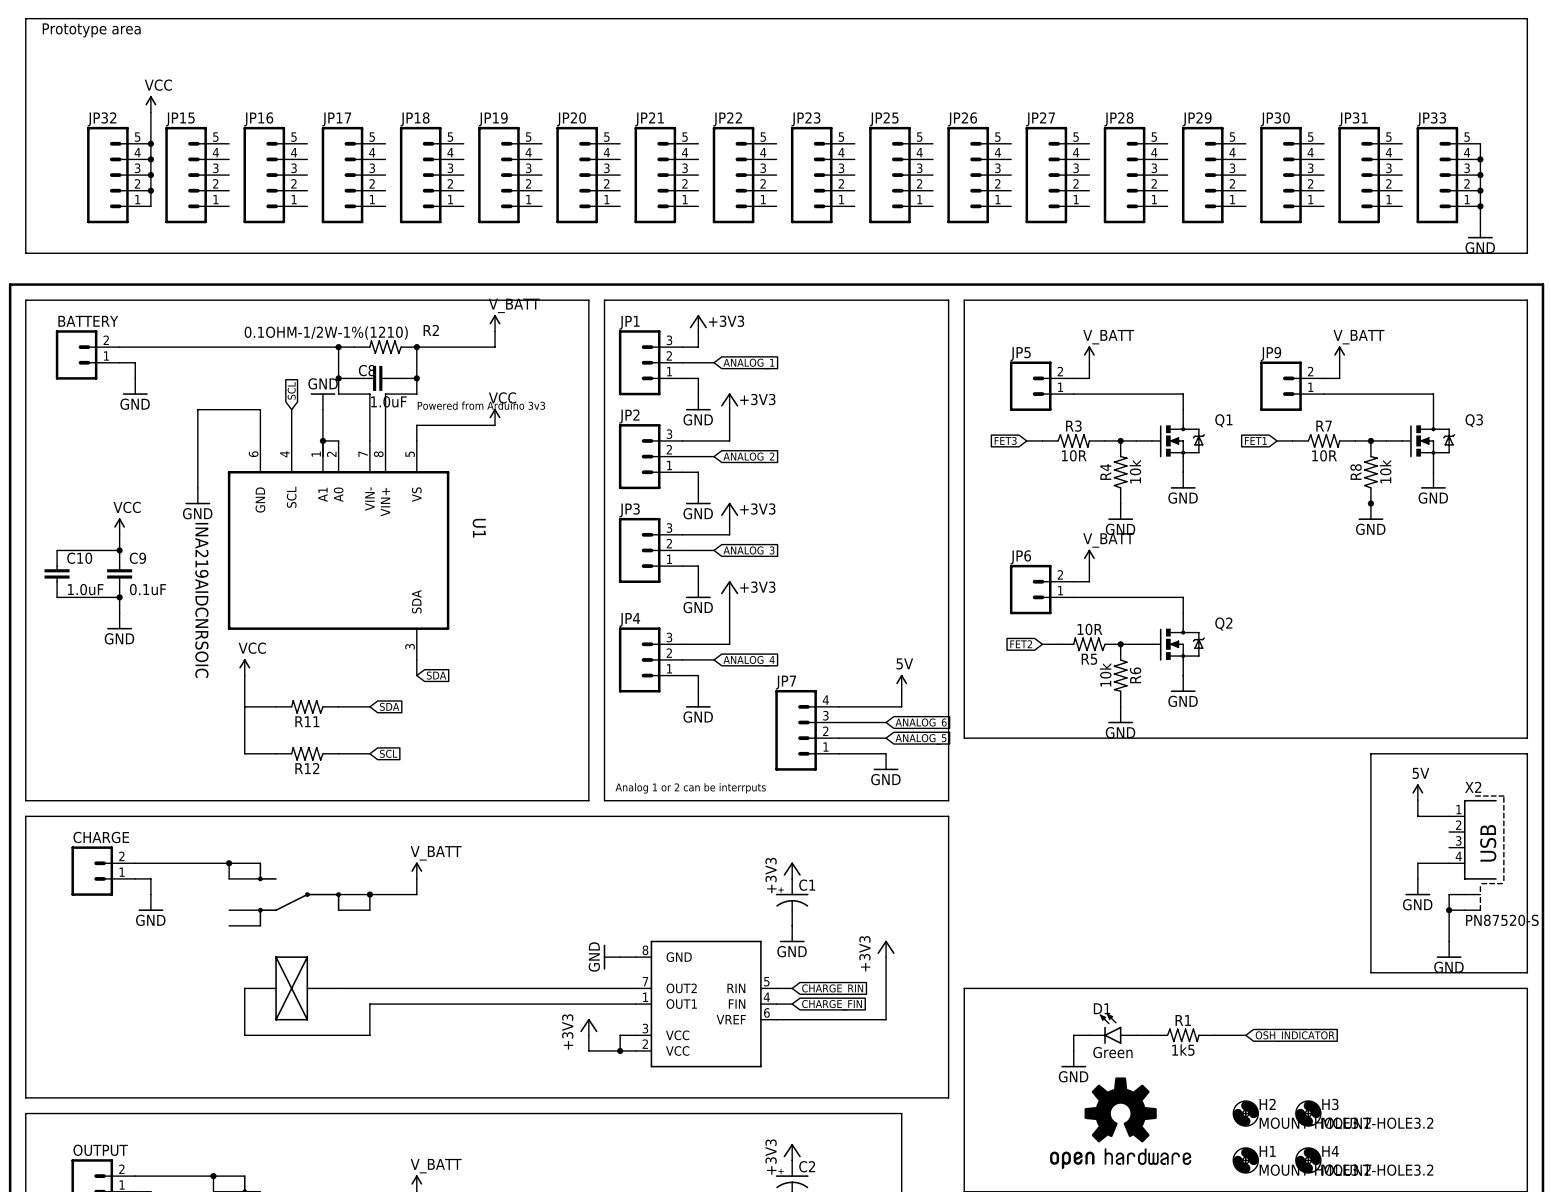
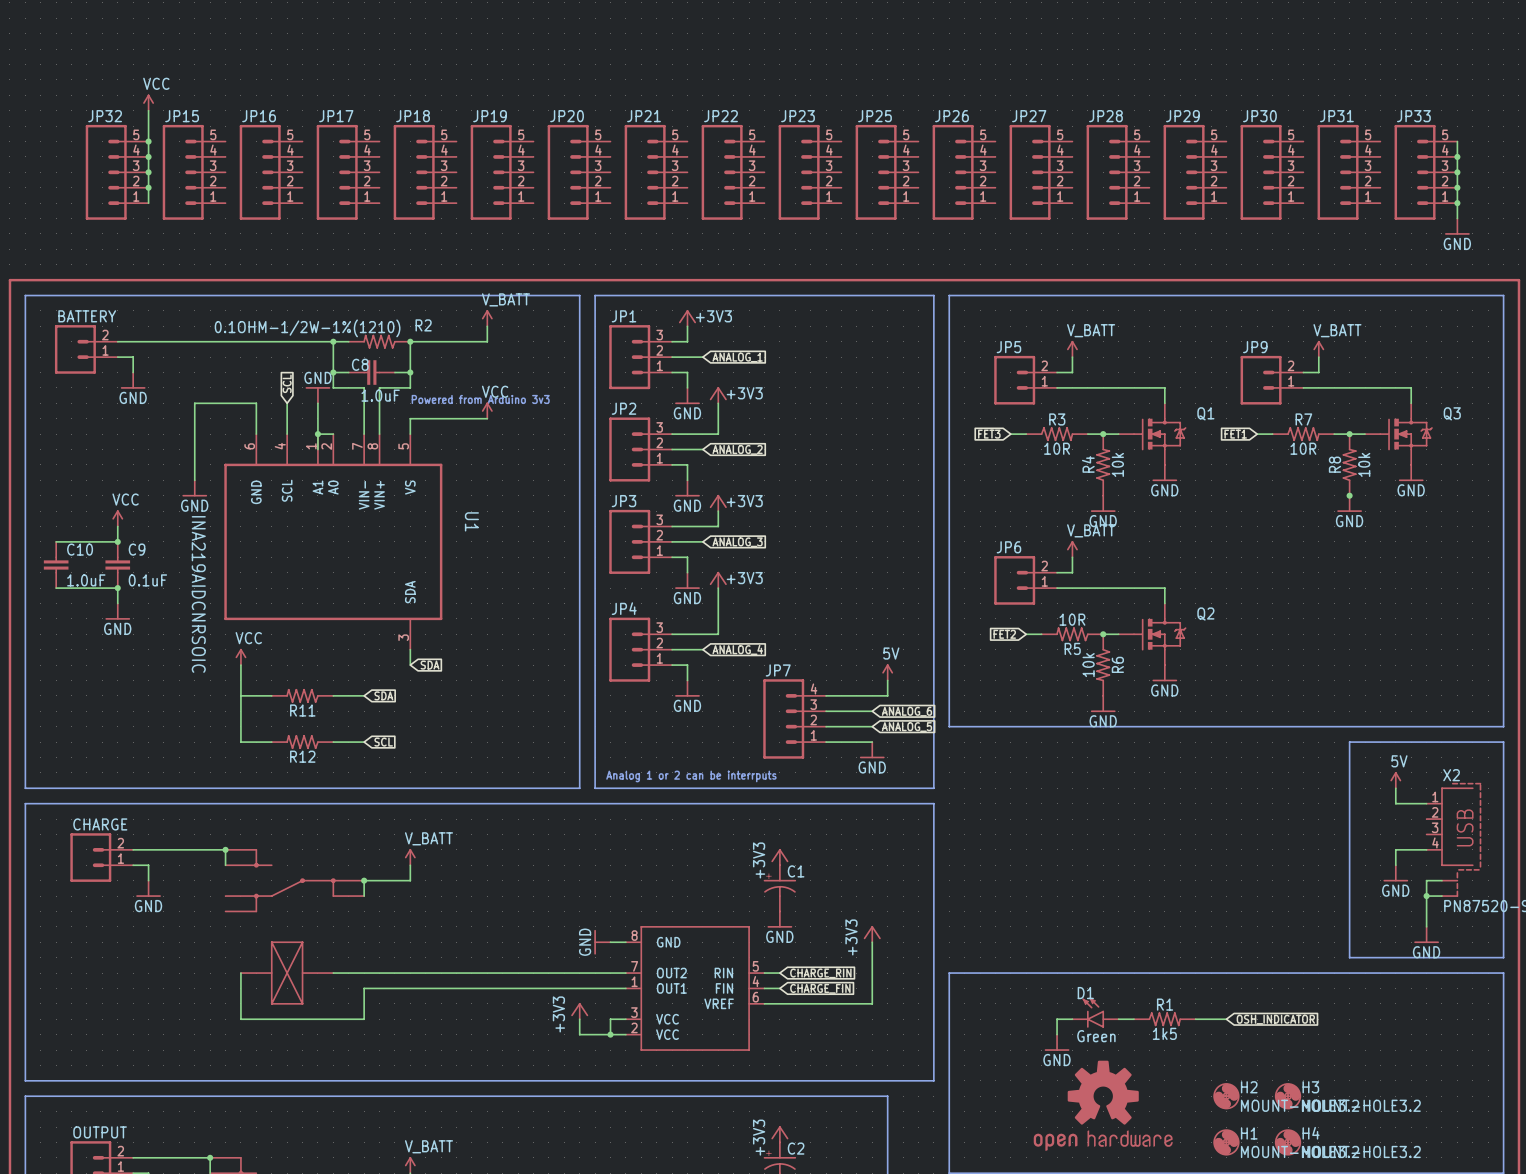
line: (25, 18) (25, 253) (1527, 253) (1527, 18) (25, 18) -> none
text: Prototype area (91, 30) -> none

